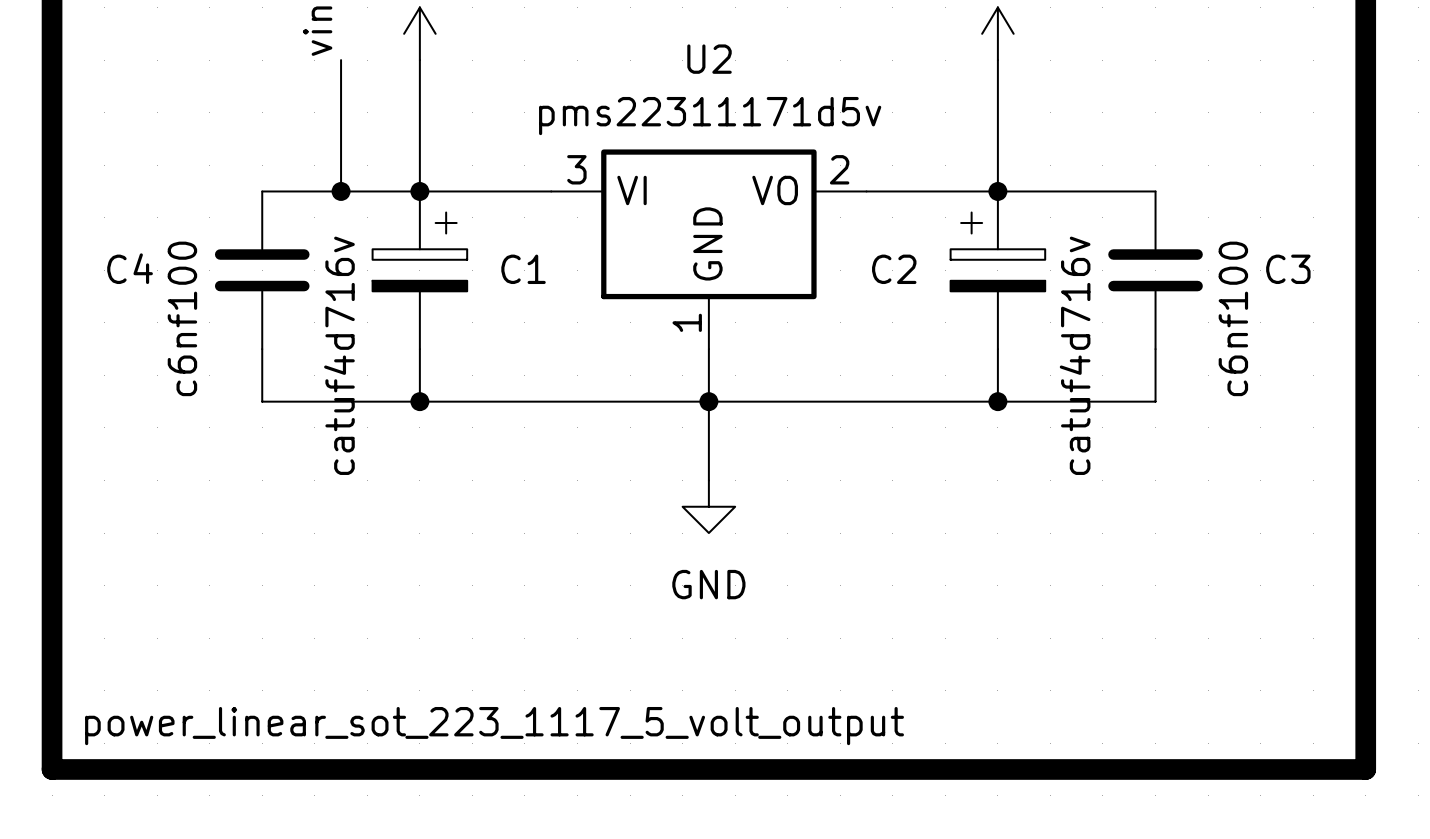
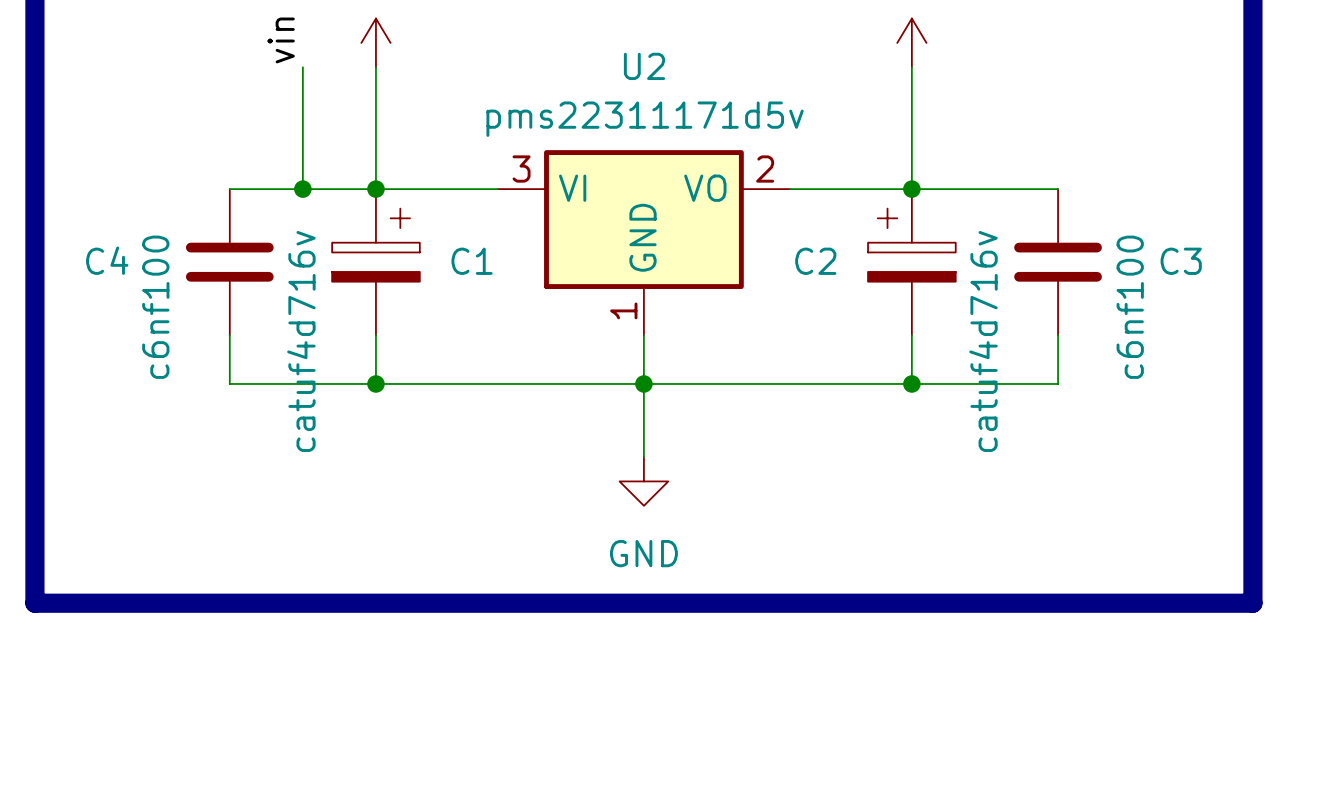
line: (52, 638) (52, 769) (1365, 769) (1365, 638) -> (34, 603) (1252, 603)
text: power_linear_sot_223_1117_5_volt_output (494, 726) -> none

